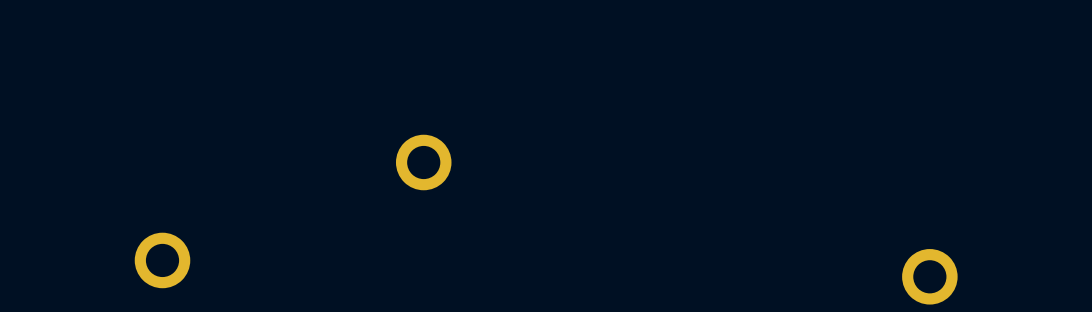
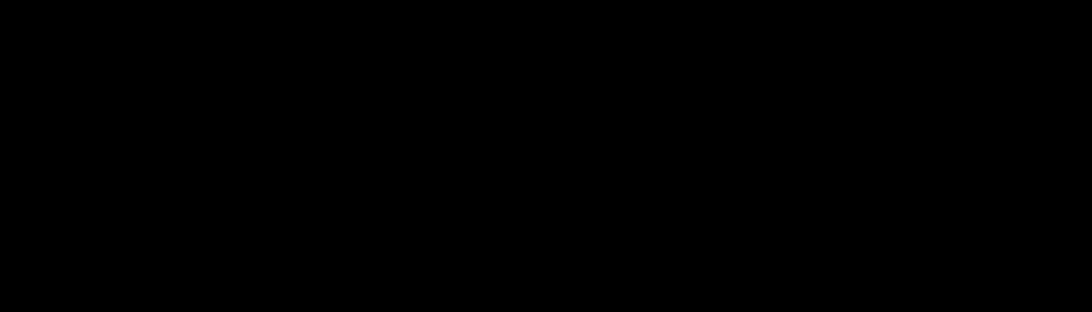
part: (423, 162) -> none
part: (162, 260) -> none
part: (929, 276) -> none

